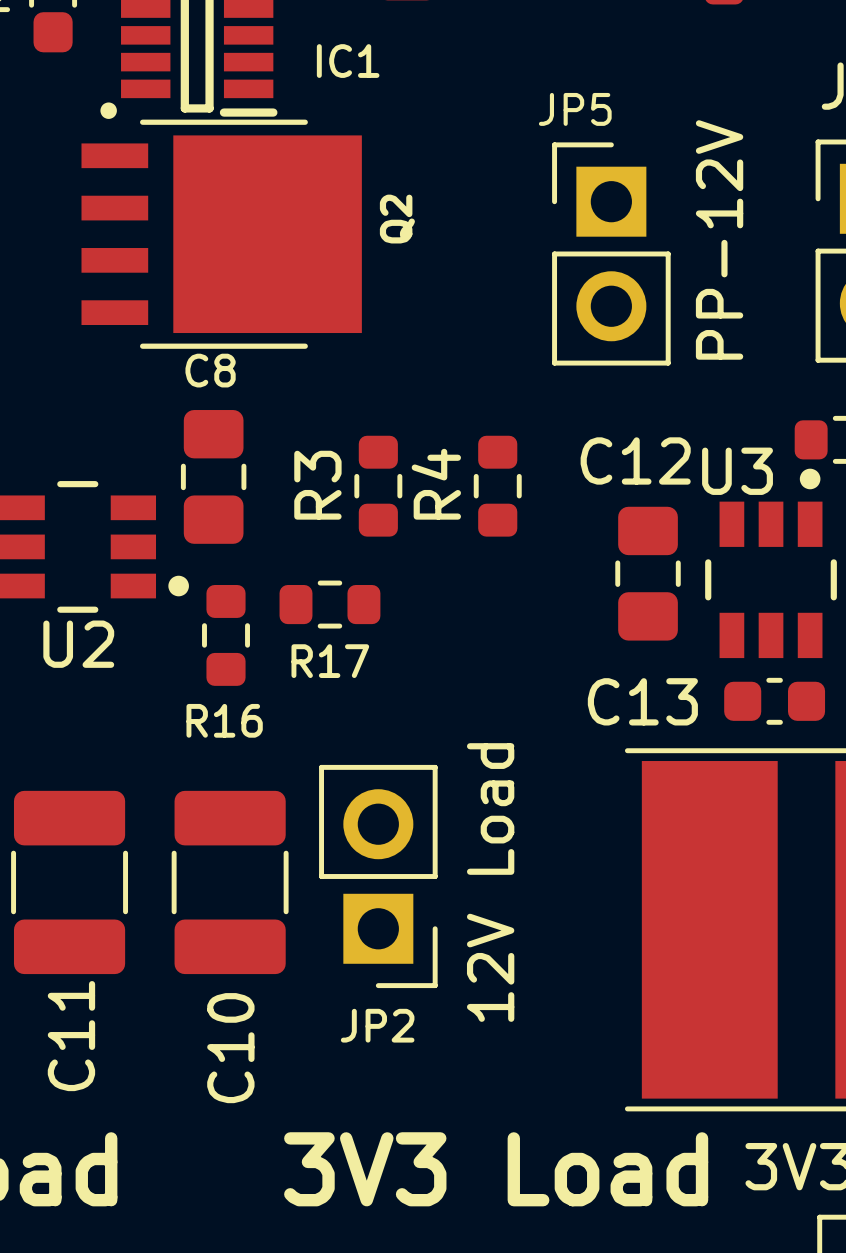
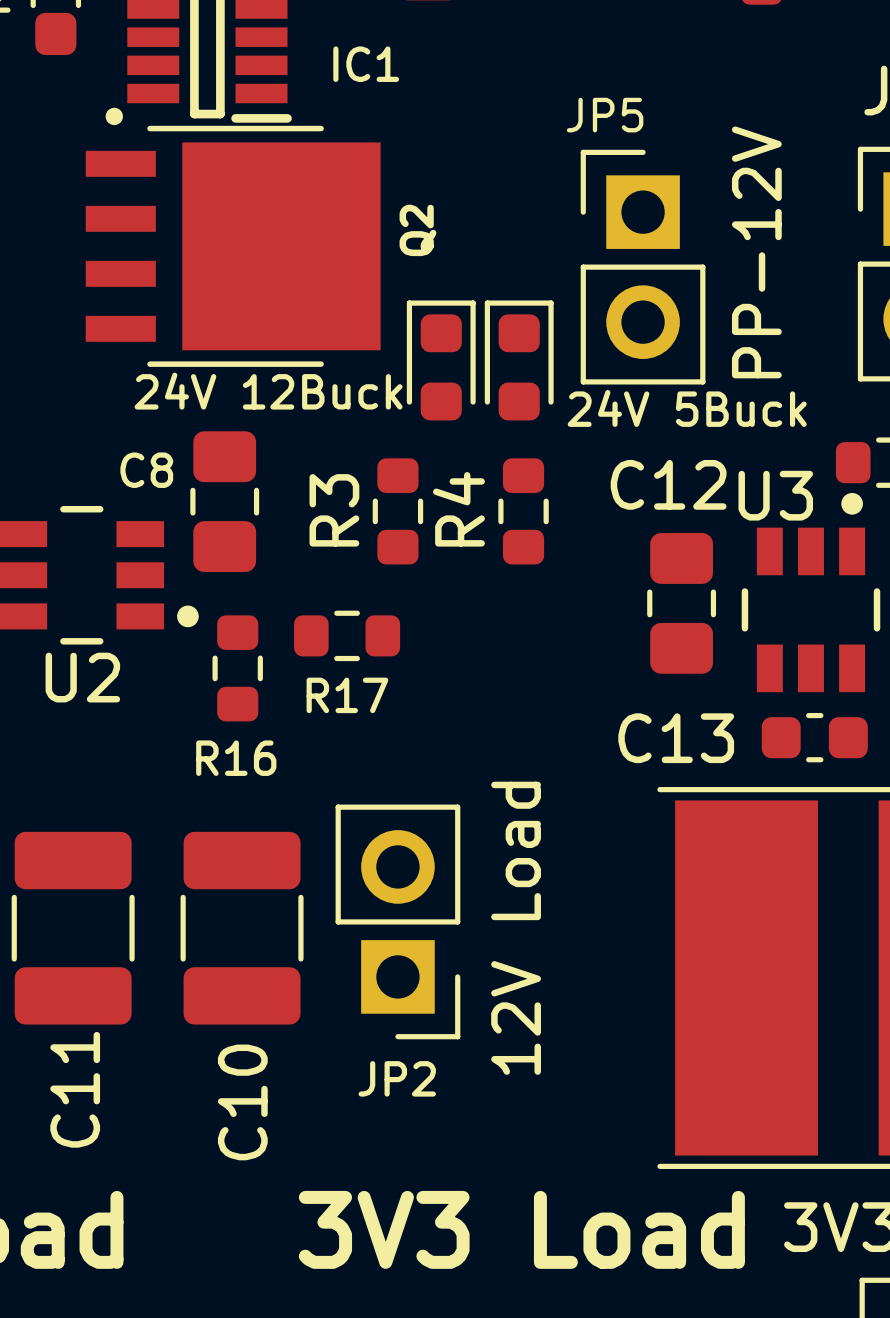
part: none -> (441, 360)
part: none -> (519, 360)
C8 name position: C8 (210, 370) -> C8 (146, 470)
text: none -> 24V 12Buck (268, 391)
text: none -> 24V 5Buck (687, 408)

